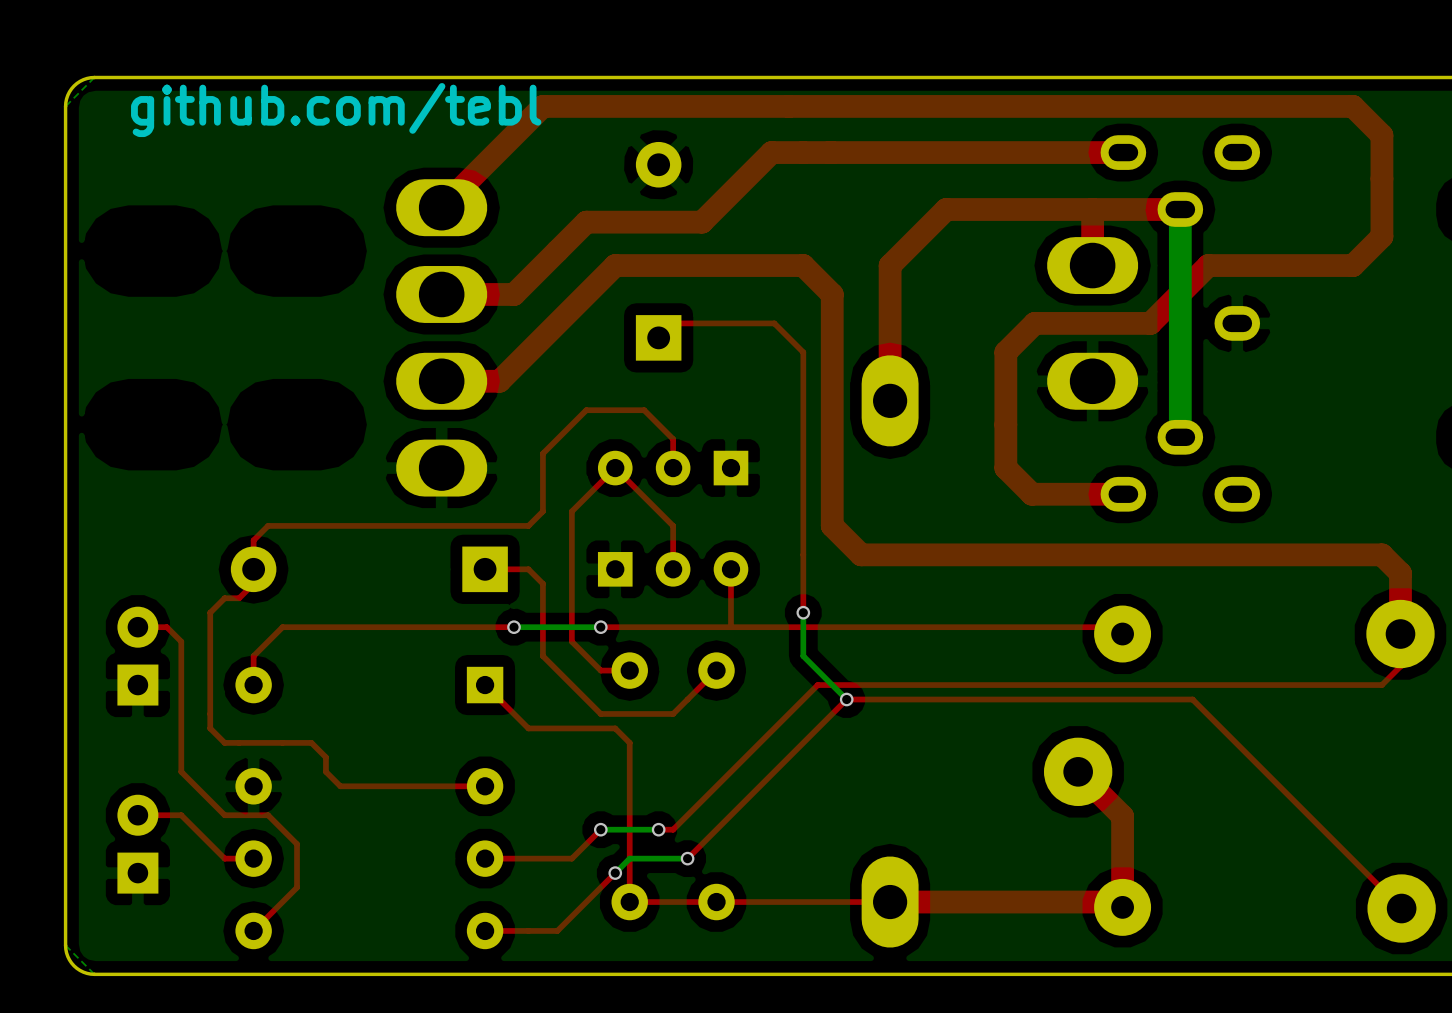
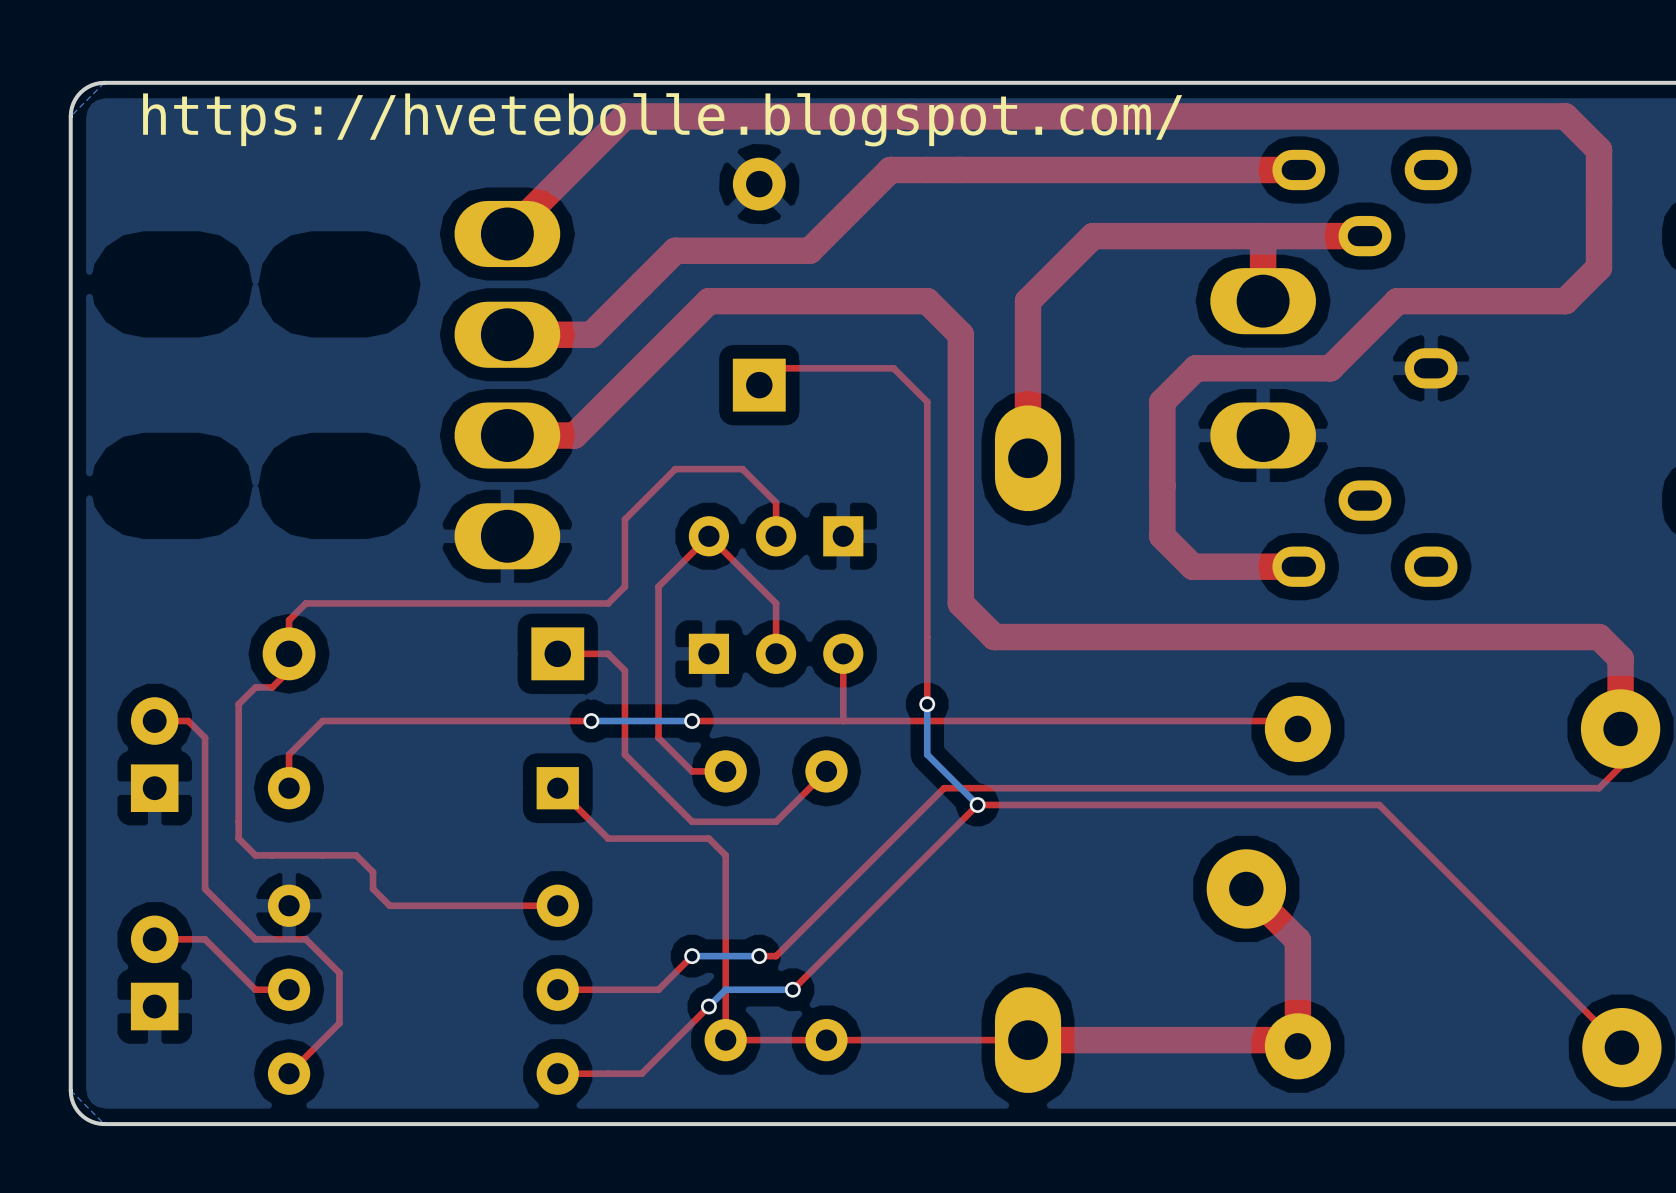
text: github.com/tebl (336, 110) -> https://hvetebolle.blogspot.com/ (662, 119)
bottom track: (1180, 209) (1180, 437) -> none

